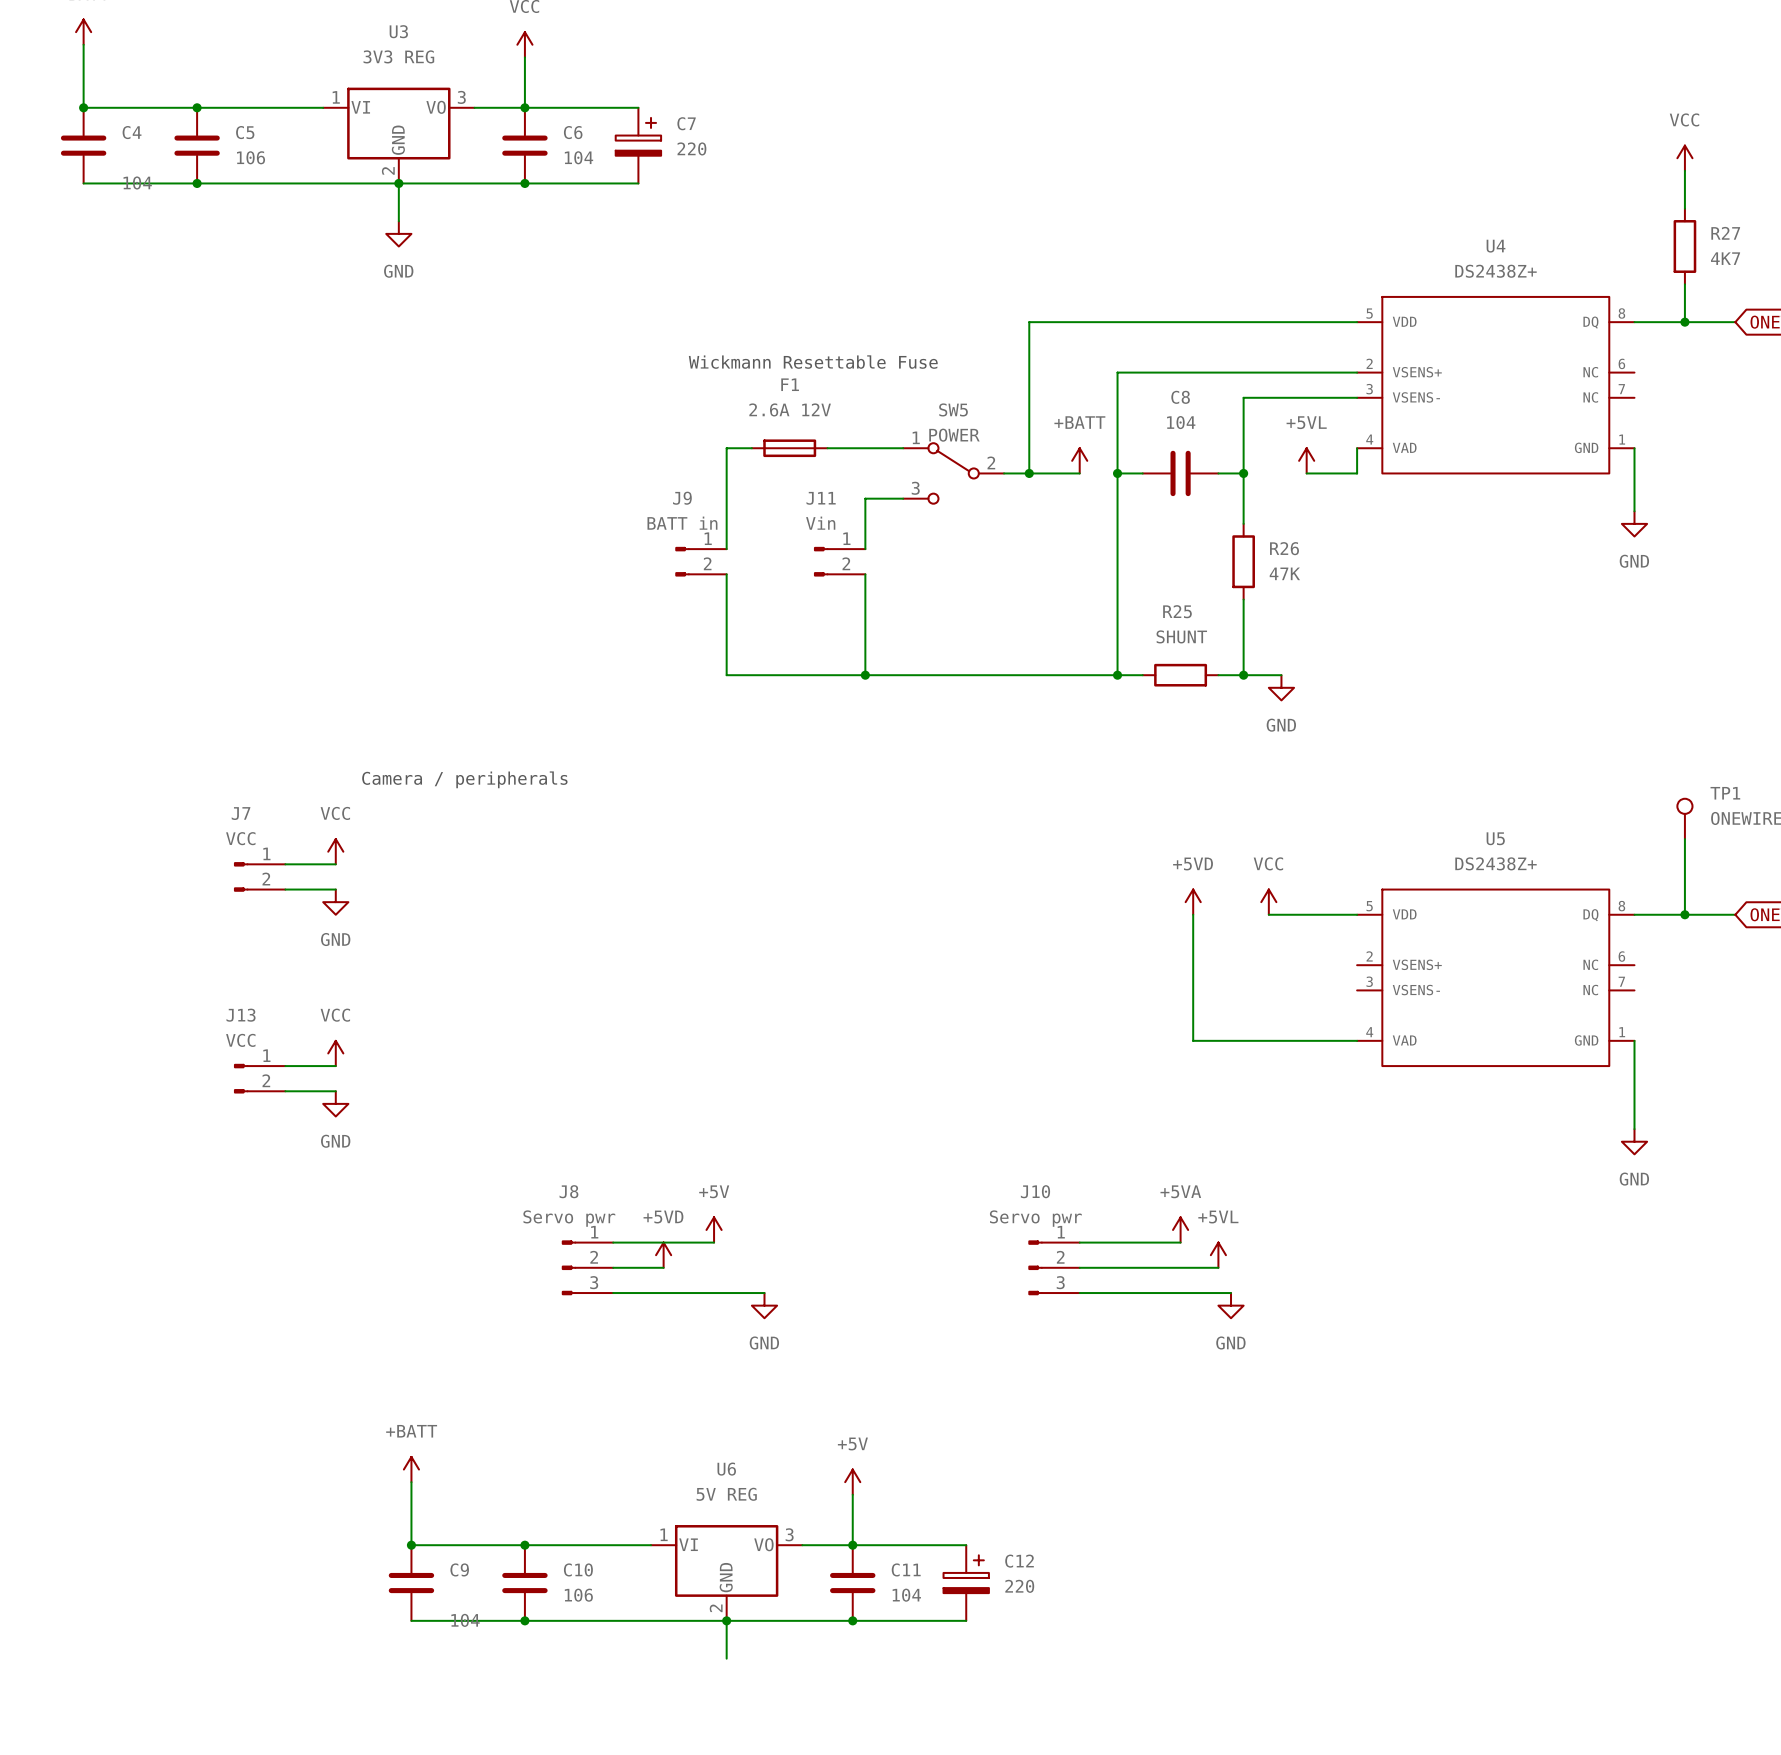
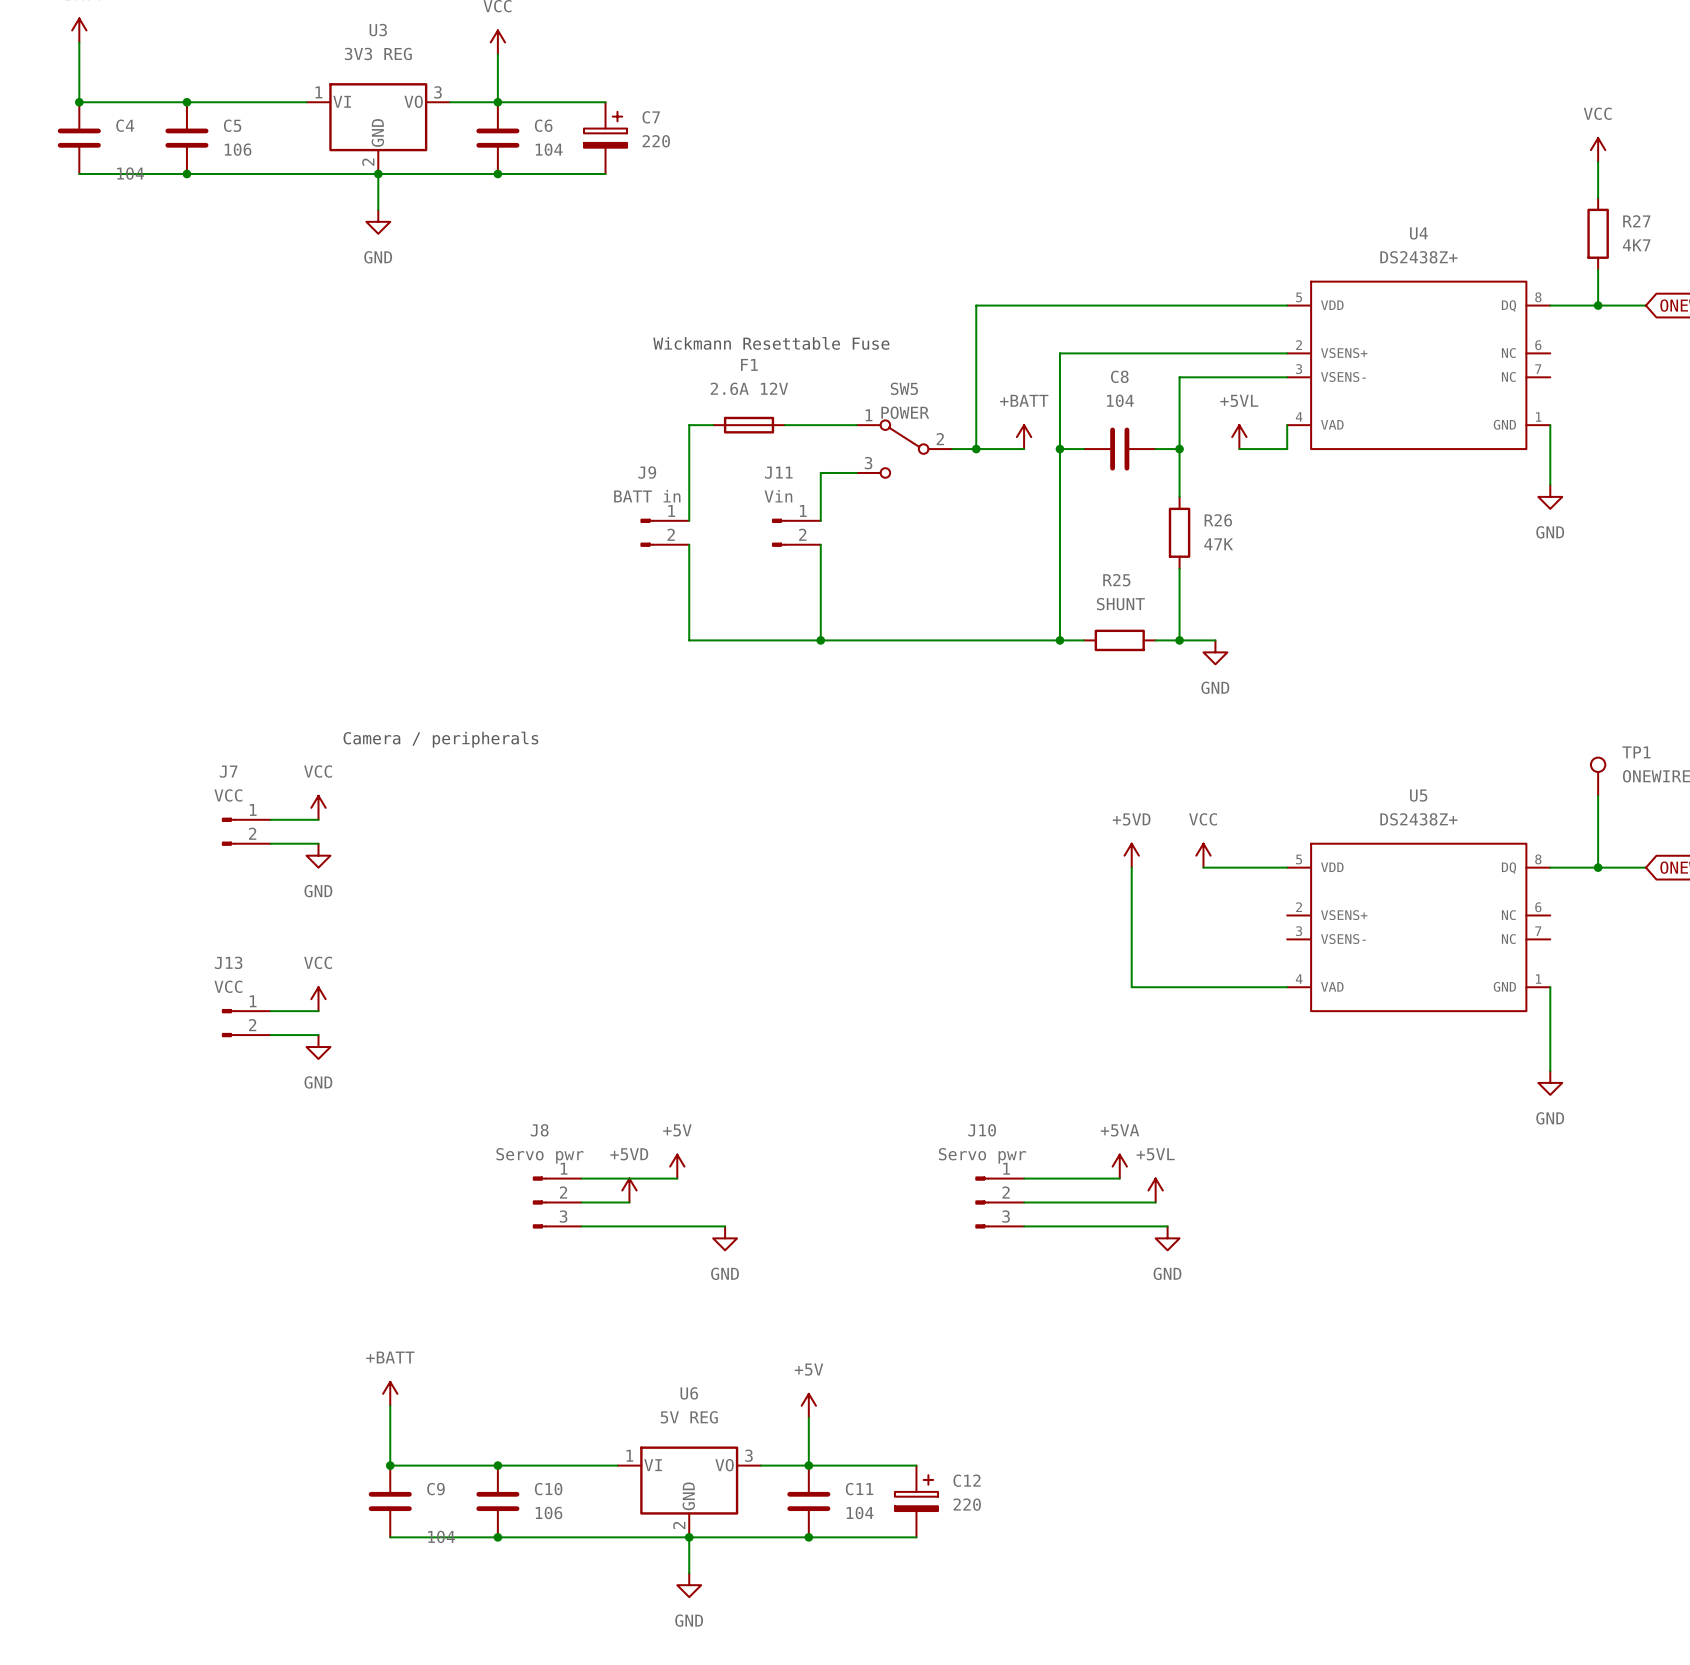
power symbol: none -> GND (689, 1585)

